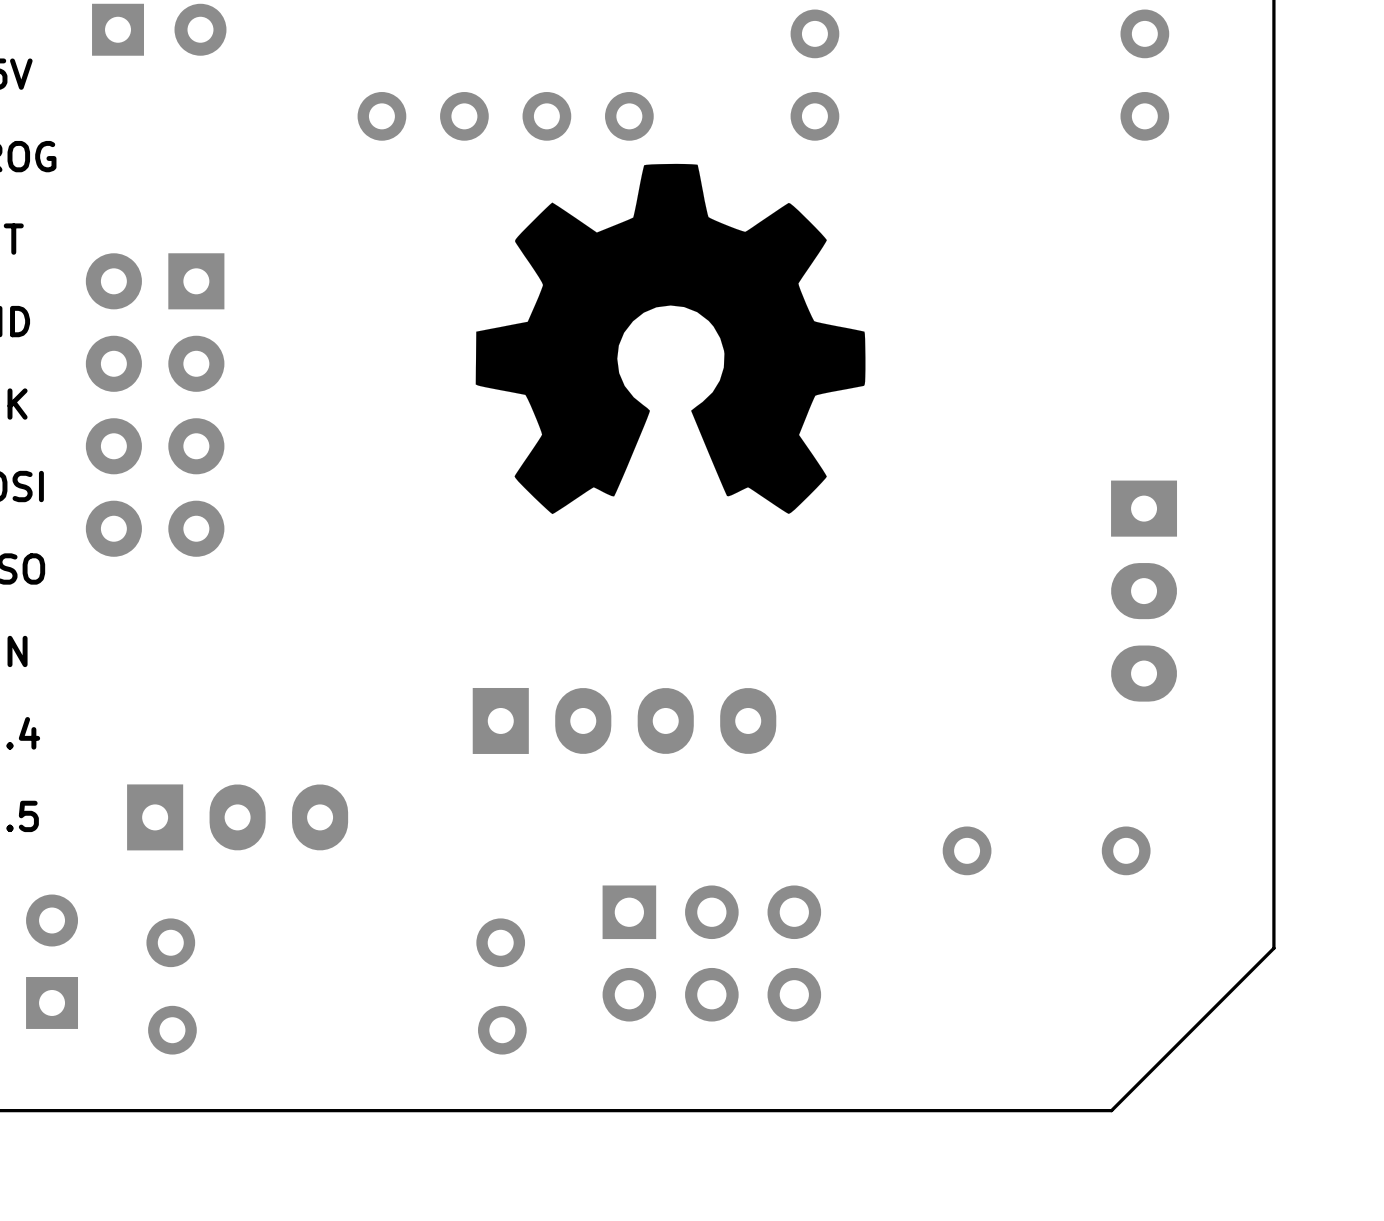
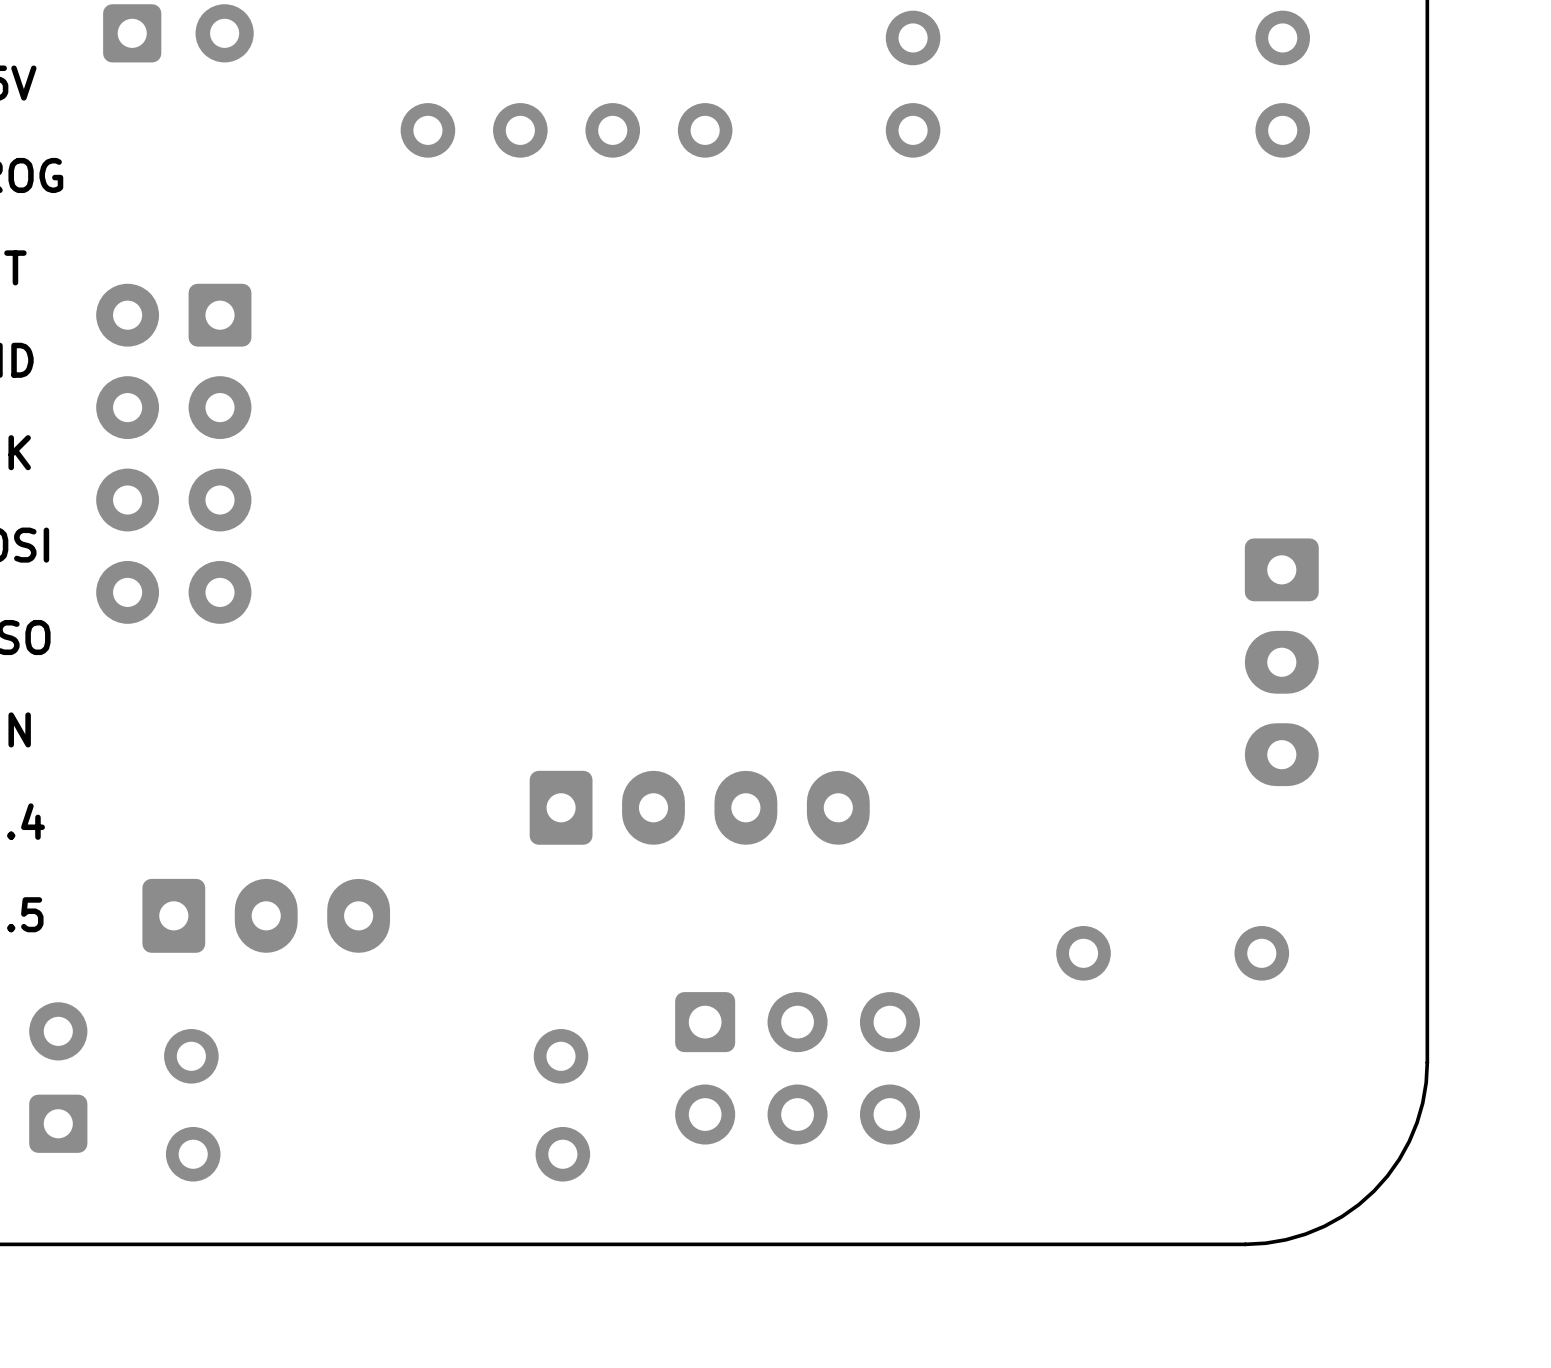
part footprint: [92, 3, 227, 56] -> [103, 4, 254, 63]
drawing: [475, 163, 866, 515] -> none
part footprint: [85, 253, 225, 557] -> [96, 283, 252, 624]
part footprint: [1111, 480, 1178, 702] -> [1244, 538, 1319, 787]
part footprint: [472, 687, 777, 754] -> [529, 770, 870, 845]
part footprint: [127, 784, 349, 851] -> [142, 878, 391, 953]
part footprint: [602, 885, 822, 1022] -> [675, 992, 920, 1145]
part footprint: [26, 894, 79, 1029] -> [29, 1002, 88, 1153]
board edge: (1273, 948) (1111, 1110) -> (1427, 1062) (1422, 1102) (1409, 1141) (1399, 1159) (1374, 1191) (1358, 1204) (1324, 1226) (1285, 1239) (1245, 1244)

